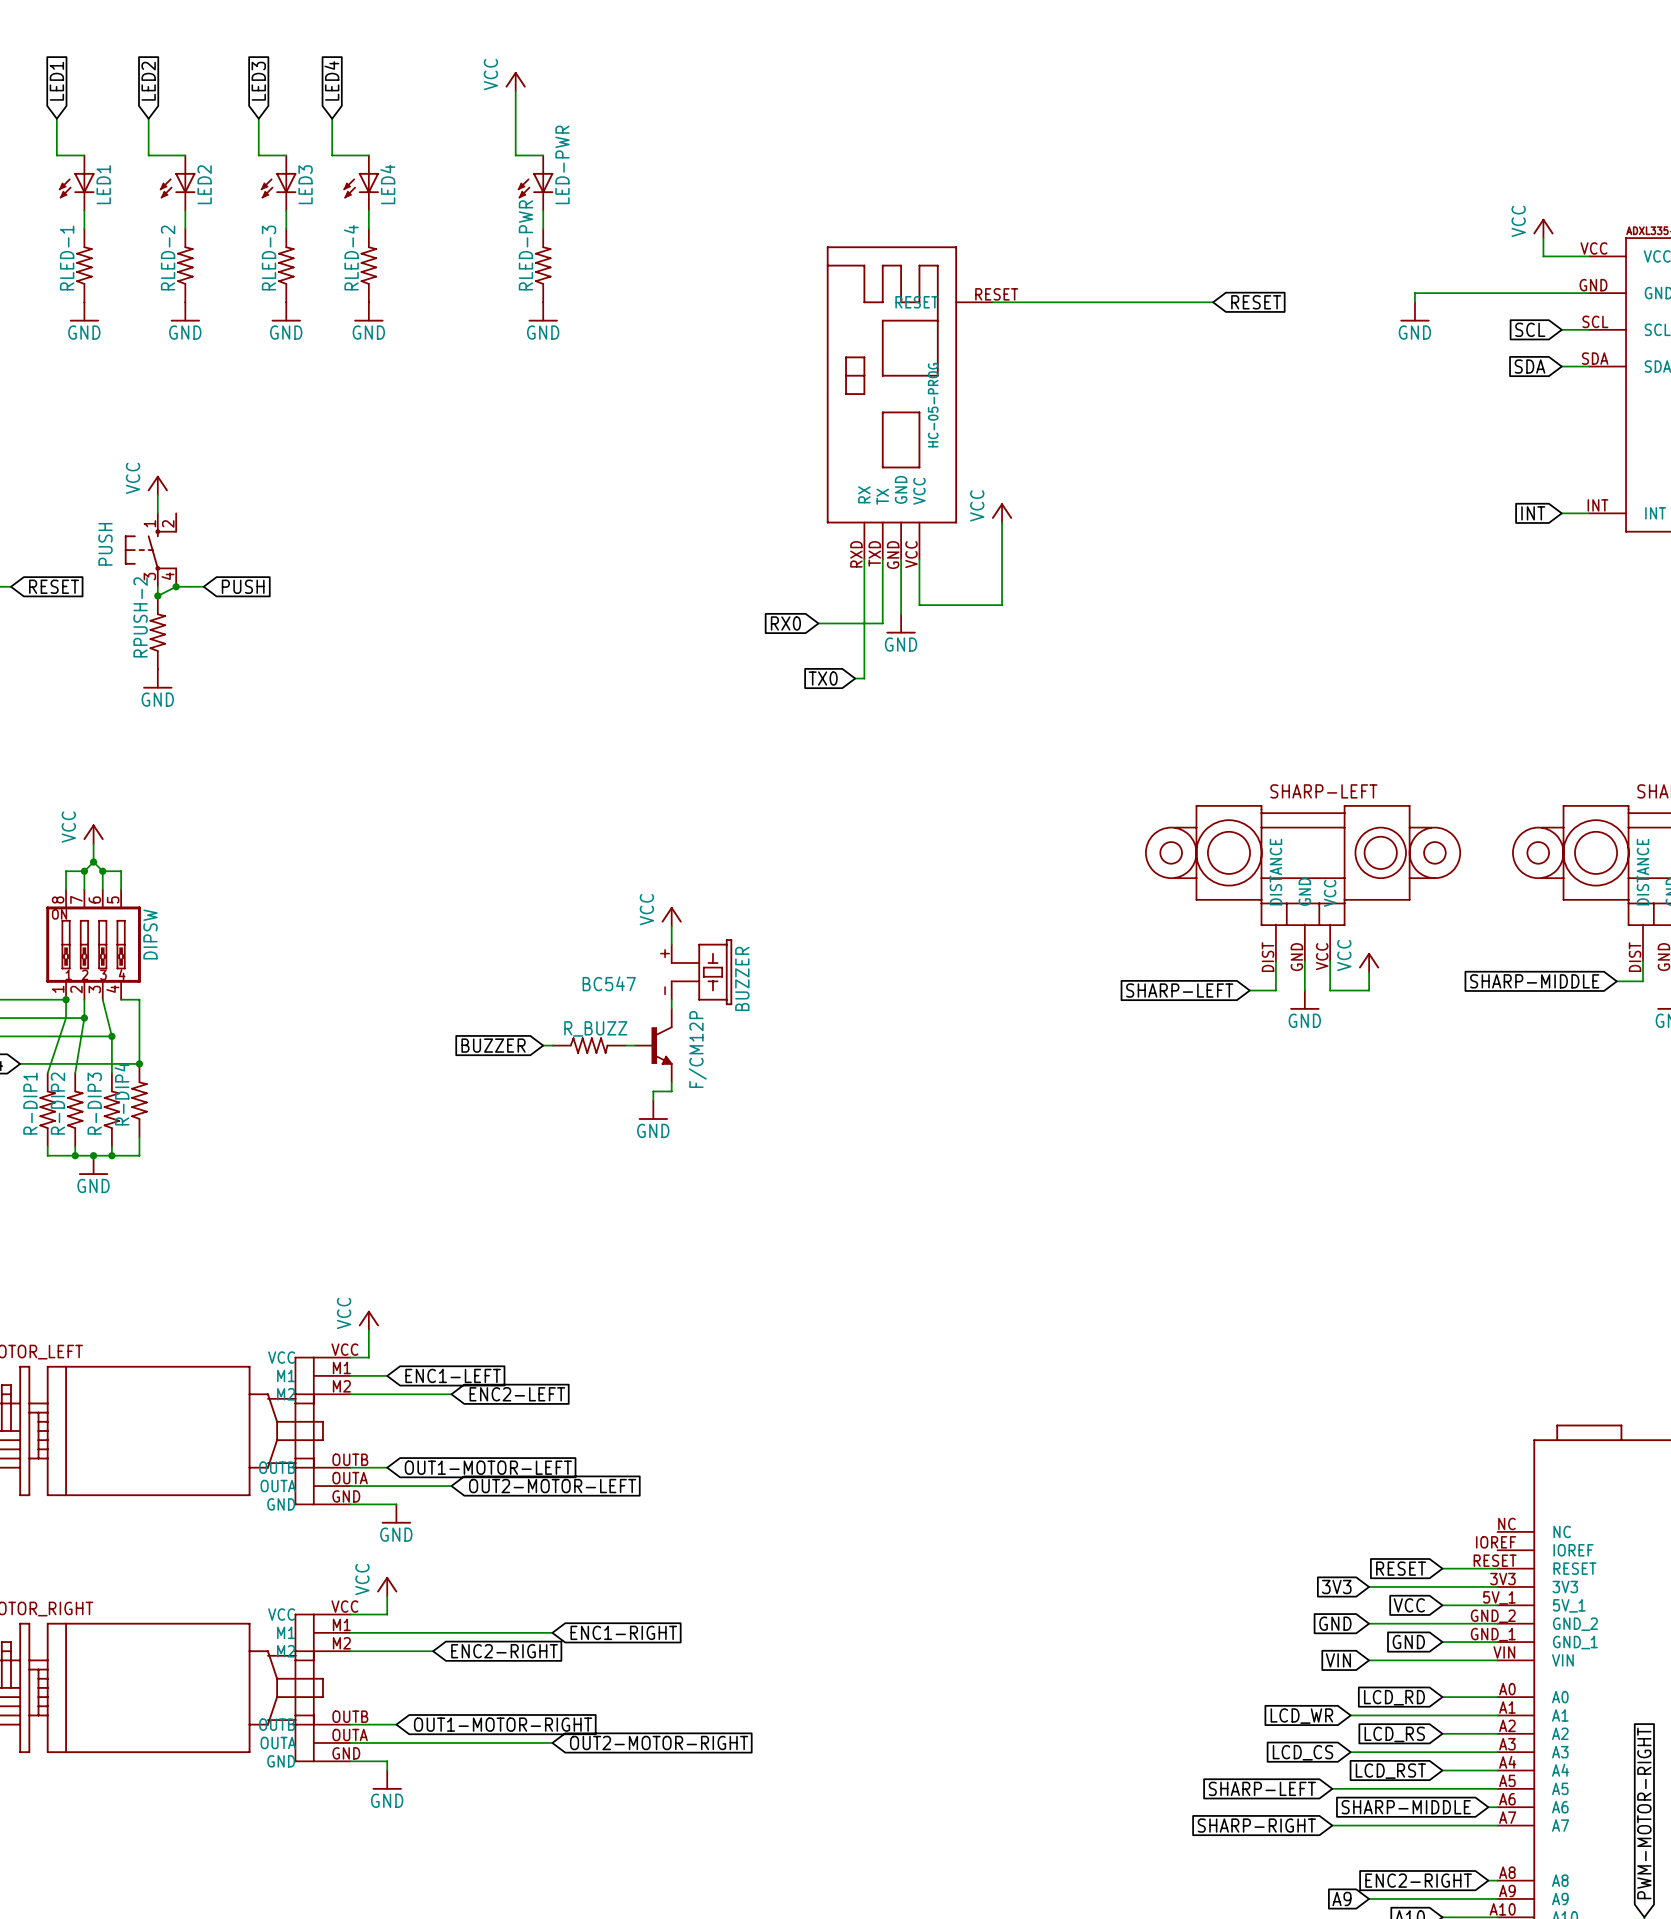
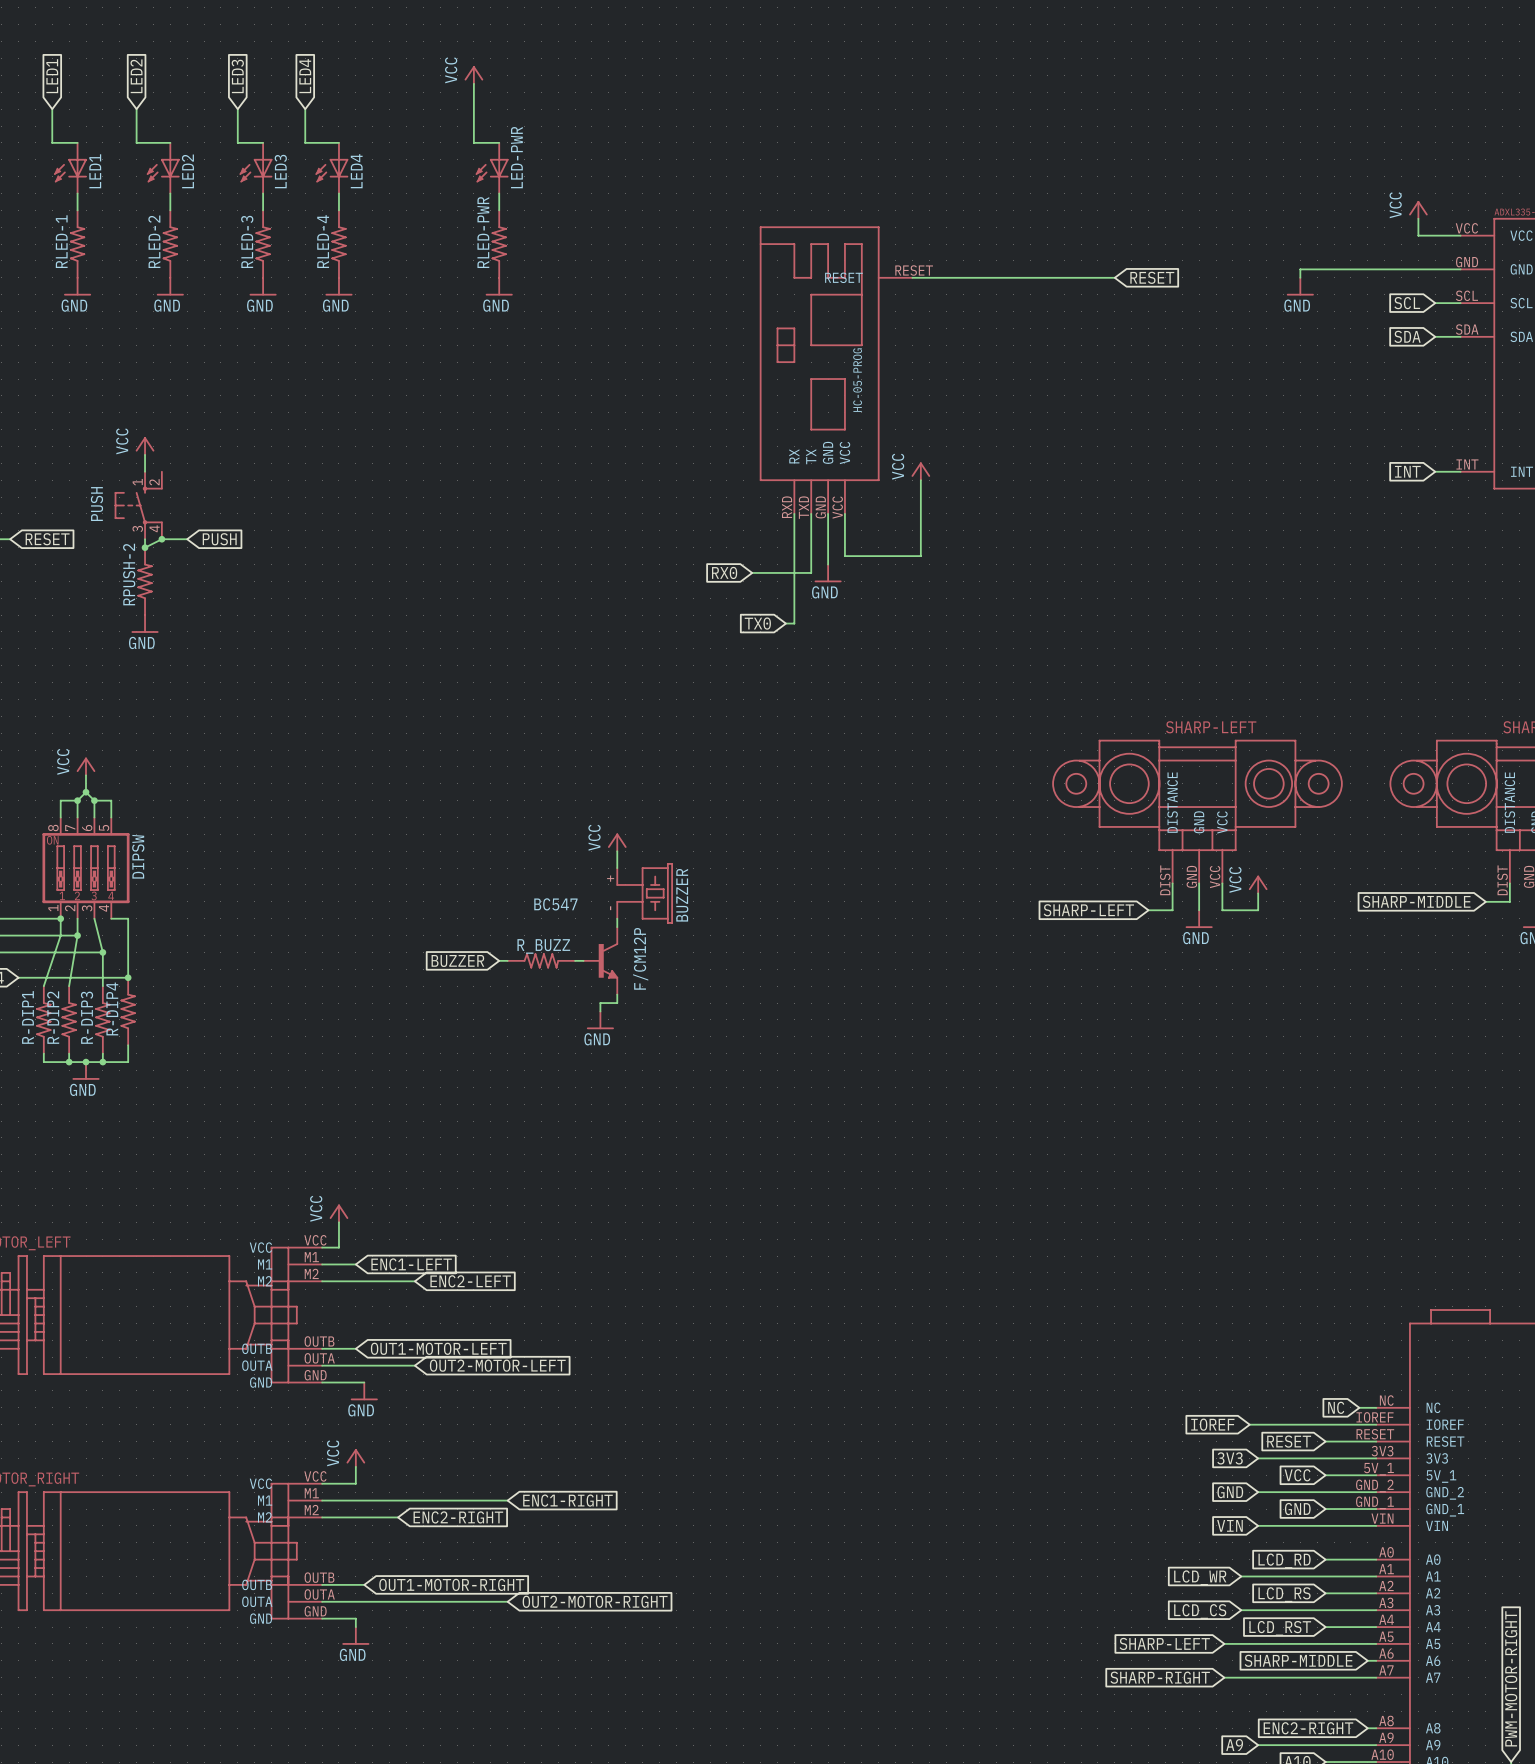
global label: none -> NC (1336, 1407)
wire: none -> (1359, 1407) (1376, 1407)
global label: none -> IOREF (1212, 1424)
wire: none -> (1249, 1424) (1376, 1424)

